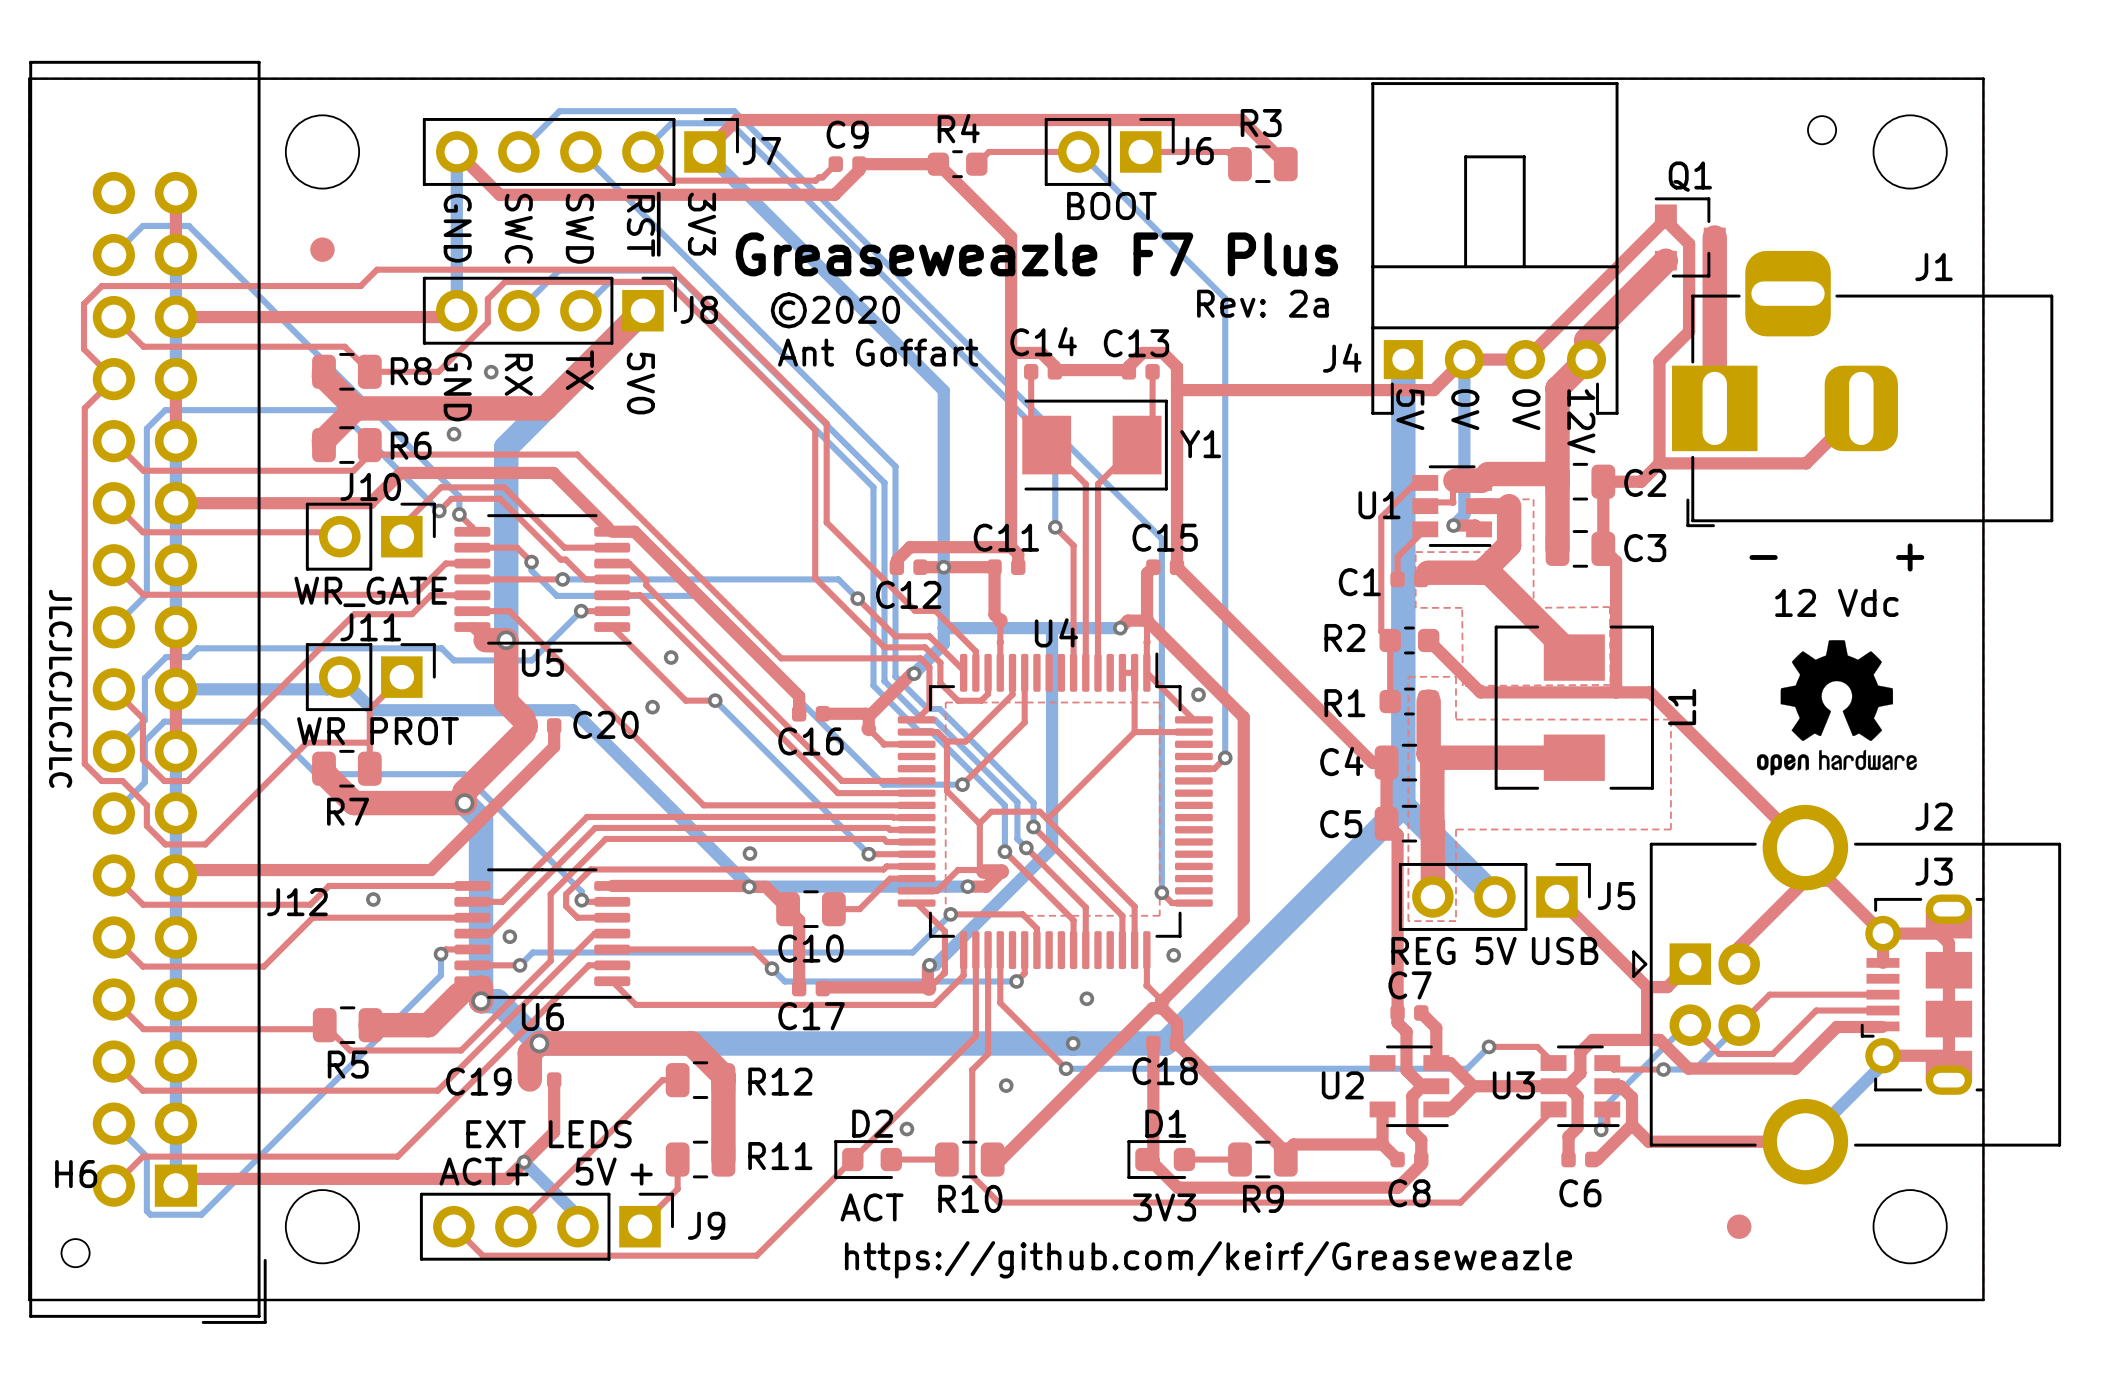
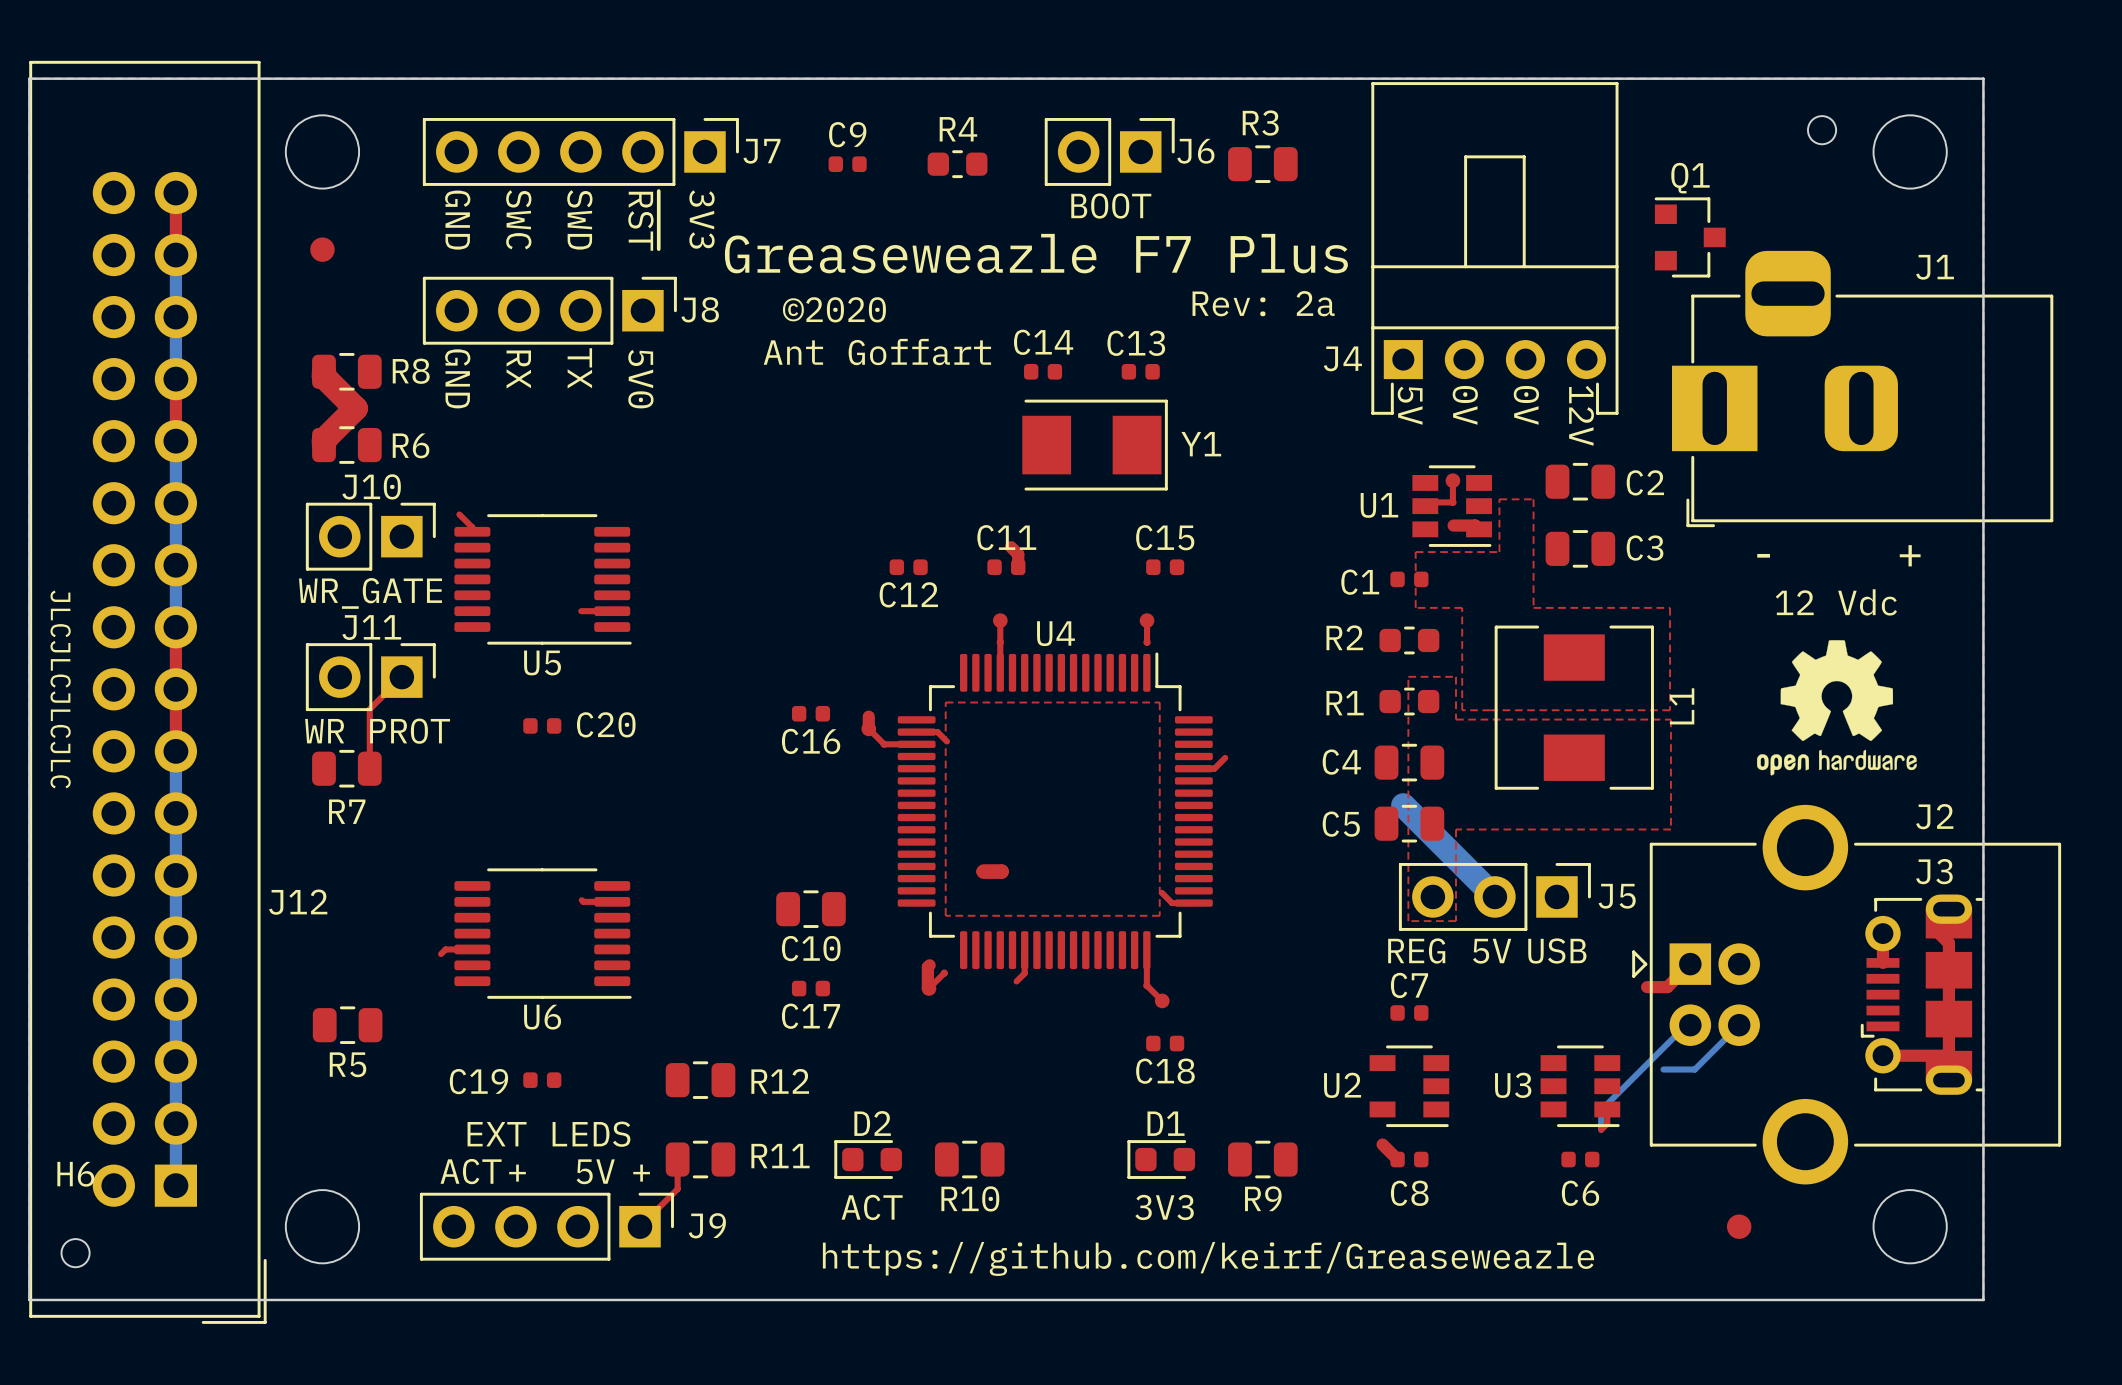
top track: (456, 151) (499, 194) (834, 194) (859, 169) (859, 164) (938, 164) (1011, 236) (1011, 547) (910, 547) (896, 560) (896, 567) -> none
bottom track: (456, 151) (456, 310) -> none
bottom track: (518, 151) (559, 111) (734, 111) (1161, 538) (1161, 892) -> none
bottom track: (580, 151) (895, 466) (895, 676) (927, 708) (939, 708) (1033, 802) (1033, 826) -> none
top track: (642, 151) (671, 180) (815, 180) (818, 177) (822, 177) (835, 164) -> none
bottom track: (642, 151) (671, 123) (730, 123) (1055, 447) (1055, 527) -> none
top track: (704, 151) (736, 120) (1241, 120) (1285, 164) -> none
bottom track: (704, 151) (943, 390) (943, 644) (914, 673) -> none
top track: (1078, 151) (988, 151) (976, 164) -> none
bottom track: (1078, 151) (1225, 298) (1225, 757) -> none
top track: (1140, 151) (1227, 151) (1239, 164) -> none
top track: (1665, 220) (1525, 359) (1464, 359) (1433, 390) (1177, 390) -> none
top track: (1665, 220) (1689, 243) (1689, 331) (1659, 361) (1659, 463) -> none
top track: (1714, 237) (1714, 408) -> none
bottom track: (113, 255) (142, 225) (188, 225) (459, 496) (459, 514) -> none
top track: (1665, 260) (1586, 340) (1586, 359) (1557, 388) (1557, 548) -> none
top track: (456, 310) (450, 317) (175, 317) -> none
bottom track: (518, 310) (558, 270) (672, 270) (884, 482) (884, 681) (923, 719) (935, 719) (1017, 802) (1017, 838) (1026, 847) -> none
bottom track: (580, 310) (609, 282) (668, 282) (873, 487) (873, 685) (918, 730) (930, 730) (1004, 805) (1004, 851) -> none
top track: (642, 310) (545, 408) (355, 408) -> none
bottom track: (642, 310) (506, 447) (506, 640) -> none
top track: (113, 317) (143, 346) (344, 346) (369, 371) (438, 371) (487, 322) (487, 299) (505, 281) (667, 281) (815, 430) (815, 578) (884, 647) (925, 647) (940, 662) (940, 683) (957, 700) (981, 700) (988, 693) (988, 672) -> none
top track: (1011, 352) (1041, 352) (1054, 366) (1054, 371) -> none
bottom track: (1403, 359) (1403, 805) (1165, 1043) (539, 1043) (497, 1001) (481, 1001) (481, 819) (464, 803) -> none
bottom track: (1464, 359) (1464, 514) (1453, 525) -> none
top track: (1054, 370) (1128, 370) -> none
top track: (1031, 371) (1031, 429) (1085, 484) (1085, 672) -> none
top track: (1128, 371) (1128, 366) (1142, 352) (1162, 352) (1177, 367) (1177, 567) (1372, 762) (1386, 762) (1386, 823) (1397, 834) (1397, 1022) (1406, 1031) (1406, 1070) (1422, 1086) -> none
top track: (1152, 371) (1152, 429) (1097, 484) (1097, 672) -> none
via: (491, 372) -> none
top track: (1861, 408) (1806, 463) (1659, 463) -> none
via: (454, 434) -> none
top track: (113, 441) (143, 470) (353, 470) (369, 454) -> none
top track: (369, 454) (577, 454) (781, 658) (920, 658) (929, 667) (929, 707) (916, 719) -> none
top track: (1659, 463) (1641, 481) (1603, 481) (1603, 548) (1616, 561) (1616, 692) -> none
top track: (1557, 474) (1487, 474) (1481, 480) (1452, 480) -> none
top track: (1425, 482) (1415, 482) (1381, 517) (1381, 631) (1390, 640) (1390, 701) -> none
top track: (113, 503) (142, 532) (335, 532) (339, 536) -> none
top track: (175, 503) (370, 503) (400, 472) (553, 472) (612, 531) (634, 531) (799, 696) (799, 713) -> none
top track: (1479, 506) (1509, 506) (1509, 545) (1481, 572) (1427, 572) (1421, 579) -> none
top track: (439, 511) (451, 498) (499, 498) (560, 559) (565, 559) (585, 579) (612, 579) -> none
bottom track: (439, 511) (338, 410) (165, 410) (146, 428) (146, 594) (113, 627) -> none
via: (439, 511) -> none
via: (459, 514) -> none
via: (1453, 525) -> none
top track: (1055, 527) (1073, 545) (1073, 672) -> none
via: (1055, 527) -> none
top track: (1425, 529) (1397, 557) (1397, 579) -> none
top track: (401, 536) (401, 526) (440, 487) (504, 487) (564, 547) (612, 547) -> none
top track: (472, 547) (517, 547) (531, 562) -> none
bottom track: (531, 562) (531, 570) (556, 595) (694, 595) (883, 784) (962, 784) -> none
via: (531, 562) -> none
top track: (472, 563) (445, 563) (414, 594) (143, 594) (113, 565) -> none
top track: (612, 563) (629, 563) (646, 580) (646, 585) (841, 780) (916, 780) -> none
top track: (920, 567) (994, 567) (994, 614) (1000, 620) -> none
via: (943, 567) -> none
top track: (1153, 567) (1147, 573) (1147, 620) -> none
top track: (1485, 568) (1574, 657) -> none
top track: (472, 579) (562, 579) -> none
bottom track: (562, 579) (838, 579) (857, 598) -> none
via: (562, 579) -> none
top track: (472, 595) (430, 595) (412, 614) (354, 614) (187, 781) (164, 781) (142, 759) (142, 718) (113, 689) -> none
top track: (612, 595) (640, 595) (837, 793) (916, 793) -> none
top track: (857, 598) (895, 636) (929, 636) (963, 670) (963, 672) -> none
via: (857, 598) -> none
top zone outline: (1462, 607) (1462, 685) (1610, 684) (1609, 607) (1533, 607) -> (1462, 607) (1462, 710) (1670, 710) (1670, 607) (1533, 607)
top track: (472, 611) (509, 611) (703, 805) (916, 805) -> none
bottom track: (581, 611) (531, 660) (453, 660) (441, 648) (197, 648) (188, 657) (166, 657) (144, 678) (144, 720) (113, 751) -> none
via: (581, 611) -> none
top track: (1147, 620) (1127, 620) (1120, 628) -> none
top track: (1147, 620) (1243, 717) (1243, 919) (1162, 1000) (1162, 1008) -> none
top track: (472, 627) (485, 640) (506, 640) (506, 701) (530, 725) (464, 791) (464, 803) (354, 803) (323, 773) (323, 768) -> none
top track: (612, 627) (685, 700) (715, 700) -> none
bottom track: (943, 628) (1120, 628) -> none
bottom track: (1052, 628) (1052, 848) (934, 965) (929, 965) -> none
via: (1120, 628) -> none
via: (506, 640) -> none
top track: (1428, 640) (1480, 692) (1650, 692) (1805, 847) (1805, 880) -> none
top track: (1146, 642) (1146, 672) (1193, 719) -> none
via: (671, 657) -> none
top track: (975, 672) (975, 651) (935, 610) (915, 610) (826, 522) (826, 423) (672, 269) (377, 269) (360, 286) (101, 286) (83, 303) (83, 349) (113, 379) (84, 408) (84, 763) (101, 781) (122, 781) (146, 805) (146, 825) (165, 844) (205, 844) (307, 742) (369, 742) -> none
top track: (1012, 672) (1012, 694) (965, 741) (947, 741) (947, 791) (979, 823) -> none
top track: (1024, 672) (1024, 722) (962, 784) -> none
top track: (1122, 672) (1134, 672) (1134, 732) -> none
top track: (914, 673) (911, 673) (868, 716) (865, 713) (822, 713) -> none
via: (914, 673) -> none
bottom track: (175, 689) (327, 689) (339, 677) (372, 710) (572, 710) (749, 886) (967, 886) -> none
via: (1198, 694) -> none
bottom track: (715, 700) (868, 854) -> none
via: (715, 700) -> none
top track: (1428, 701) (1428, 754) (1432, 757) -> none
via: (652, 707) -> none
top track: (554, 725) (554, 746) (430, 870) (181, 870) (175, 875) -> none
top track: (1134, 732) (1047, 819) -> none
top track: (1134, 732) (1193, 732) -> none
via: (1225, 757) -> none
top track: (1432, 757) (1574, 757) -> none
top track: (1432, 757) (1432, 896) -> none
via: (962, 784) -> none
via: (464, 803) -> none
bottom track: (113, 813) (144, 782) (144, 741) (164, 721) (263, 721) (316, 774) (464, 774) (581, 891) (581, 900) -> none
top track: (916, 817) (587, 816) (502, 901) (472, 901) -> none
top track: (979, 823) (991, 811) (1039, 811) (1134, 906) (1134, 950) -> none
top track: (979, 823) (979, 871) -> none
top track: (1033, 826) (1122, 915) (1122, 950) -> none
via: (1033, 826) -> none
top track: (916, 829) (890, 829) (888, 827) (595, 827) (489, 933) (472, 933) -> none
top track: (916, 841) (886, 841) (883, 838) (605, 838) (550, 894) (550, 960) (461, 1050) (350, 1050) (324, 1025) (320, 1029) (143, 1029) (113, 999) -> none
top track: (1026, 847) (1085, 907) (1085, 950) -> none
via: (1026, 847) -> none
top track: (1004, 851) (1073, 920) (1073, 950) -> none
via: (1004, 851) -> none
via: (749, 853) -> none
top track: (868, 854) (916, 854) -> none
via: (868, 854) -> none
top track: (916, 866) (886, 866) (883, 869) (590, 869) (566, 894) (566, 906) (577, 917) (612, 917) -> none
top track: (979, 870) (958, 870) (937, 890) (916, 890) -> none
top track: (1001, 871) (986, 886) (967, 886) -> none
top track: (113, 875) (143, 904) (310, 904) (328, 885) (472, 885) -> none
top track: (916, 878) (890, 878) (859, 909) (833, 909) -> none
top track: (1805, 880) (1830, 880) (1882, 933) (1939, 933) (1948, 923) (1948, 909) -> none
top track: (1805, 880) (1739, 946) (1739, 964) -> none
top track: (612, 885) (765, 886) (799, 920) (799, 988) -> none
via: (749, 886) -> none
via: (967, 886) -> none
via: (1161, 892) -> none
top track: (1556, 896) (1647, 987) (1647, 1039) -> none
via: (373, 899) -> none
via: (581, 900) -> none
top track: (916, 903) (944, 931) (944, 973) -> none
top track: (950, 914) (1022, 914) (1036, 928) (1036, 950) -> none
bottom track: (950, 914) (912, 952) (532, 952) (520, 965) -> none
via: (950, 914) -> none
top track: (472, 917) (312, 917) (263, 966) (142, 966) (113, 937) -> none
top track: (612, 933) (594, 933) (437, 1090) (142, 1090) (113, 1061) -> none
via: (509, 936) -> none
top track: (612, 949) (752, 949) (772, 968) -> none
top track: (963, 950) (963, 975) (934, 1004) (635, 1004) (612, 981) -> none
top track: (975, 950) (975, 1036) (756, 1255) (482, 1255) (453, 1226) -> none
top track: (988, 950) (988, 1054) (972, 1069) (972, 1175) (998, 1202) (1460, 1202) (1553, 1109) -> none
top track: (1000, 950) (1000, 1002) (1066, 1068) -> none
bottom track: (441, 954) (441, 975) (201, 1214) (150, 1214) (146, 1211) (146, 1156) (113, 1123) -> none
via: (441, 954) -> none
via: (1173, 955) -> none
top track: (472, 965) (520, 965) -> none
via: (520, 965) -> none
top track: (612, 965) (588, 965) (397, 1156) (142, 1156) (113, 1185) -> none
via: (929, 965) -> none
bottom track: (772, 968) (784, 981) (1016, 981) -> none
via: (772, 968) -> none
via: (1016, 981) -> none
top track: (822, 988) (928, 988) -> none
top track: (1882, 994) (1769, 994) (1739, 1025) -> none
via: (1086, 998) -> none
top track: (481, 1001) (481, 987) (472, 981) (428, 1025) (370, 1025) -> none
via: (481, 1001) -> none
top track: (1162, 1008) (1152, 1008) (1001, 1159) (992, 1159) -> none
top track: (1162, 1008) (1177, 1023) (1177, 1043) (1285, 1152) -> none
top track: (1882, 1010) (1816, 1010) (1772, 1053) (1719, 1053) (1690, 1025) -> none
top track: (1421, 1012) (1436, 1028) (1436, 1063) (1450, 1063) (1473, 1086) -> none
top track: (1882, 1026) (1836, 1027) (1795, 1068) (1688, 1068) (1659, 1039) (1592, 1039) (1580, 1052) (1580, 1073) (1567, 1086) -> none
via: (539, 1043) -> none
via: (1073, 1043) -> none
top track: (1153, 1043) (1153, 1163) (1177, 1187) (1397, 1187) (1421, 1164) (1421, 1140) (1412, 1131) (1412, 1096) (1422, 1086) -> none
top track: (1489, 1046) (1537, 1046) (1553, 1063) -> none
bottom track: (1489, 1046) (1467, 1068) (1066, 1068) -> none
via: (1489, 1046) -> none
bottom track: (1882, 1055) (1882, 1064) (1805, 1141) -> none
top track: (1607, 1063) (1613, 1069) (1663, 1069) -> none
via: (1066, 1068) -> none
via: (1663, 1069) -> none
top track: (530, 1080) (529, 1053) (539, 1043) (691, 1043) (723, 1075) (723, 1159) -> none
top track: (554, 1080) (554, 1132) (507, 1178) (182, 1178) (175, 1185) -> none
top track: (677, 1080) (662, 1080) (515, 1226) -> none
via: (1006, 1085) -> none
top track: (1473, 1086) (1567, 1086) -> none
top track: (1473, 1086) (1450, 1109) (1436, 1109) -> none
top track: (1567, 1086) (1577, 1096) (1577, 1127) (1568, 1136) (1568, 1159) -> none
top track: (1607, 1086) (1620, 1086) (1632, 1097) (1632, 1124) -> none
top track: (1382, 1109) (1382, 1144) (1293, 1144) (1285, 1152) -> none
top track: (1632, 1124) (1597, 1159) (1592, 1159) -> none
top track: (1632, 1124) (1648, 1141) (1805, 1141) -> none
via: (906, 1129) -> none
via: (1601, 1129) -> none
top track: (891, 1159) (946, 1159) -> none
top track: (1184, 1159) (1239, 1159) -> none
bottom track: (524, 1162) (577, 1215) (577, 1226) -> none
via: (524, 1162) -> none

